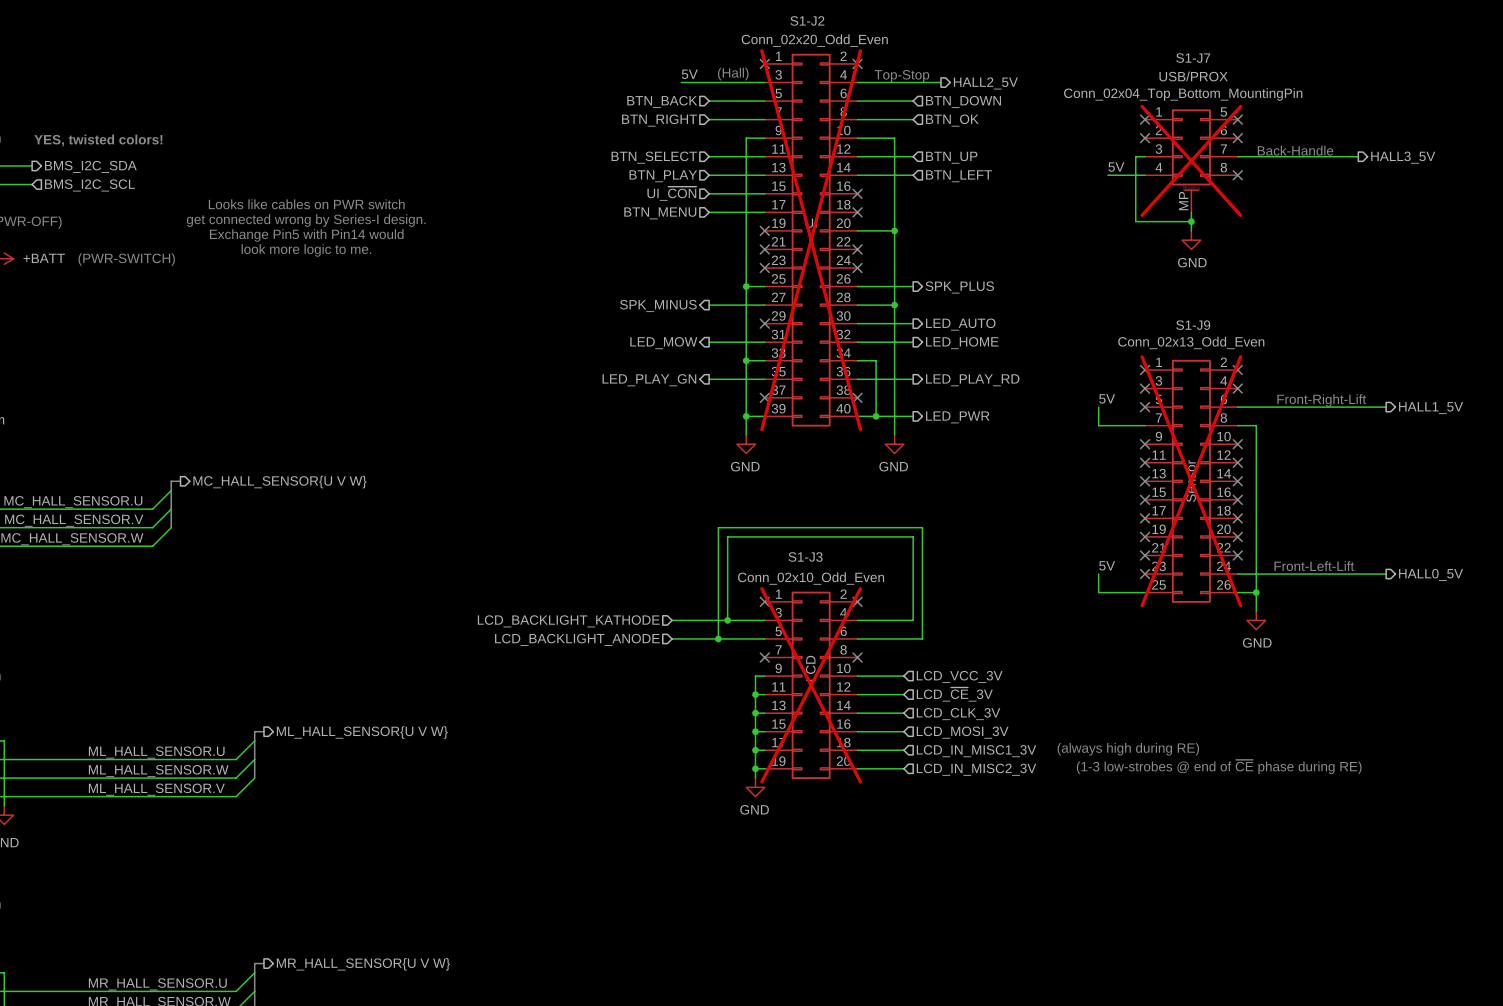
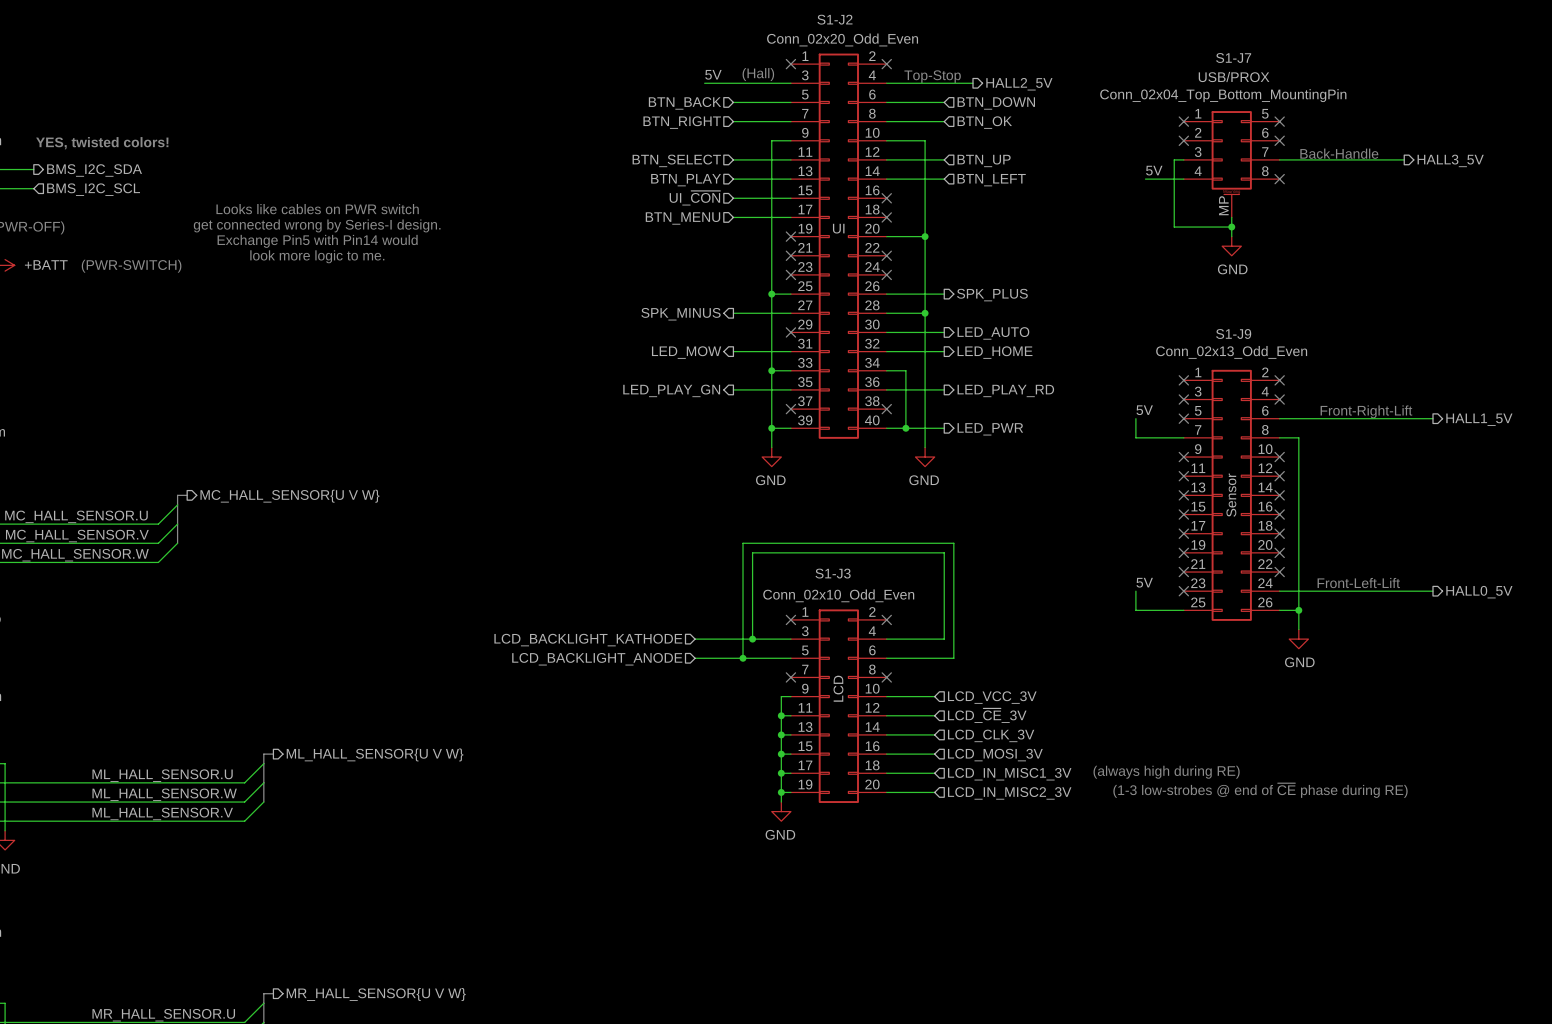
S1-J7 do-not-place cross: (1191, 160) -> none
S1-J2 do-not-place cross: (811, 240) -> none
S1-J9 do-not-place cross: (1191, 481) -> none
S1-J3 do-not-place cross: (811, 685) -> none

